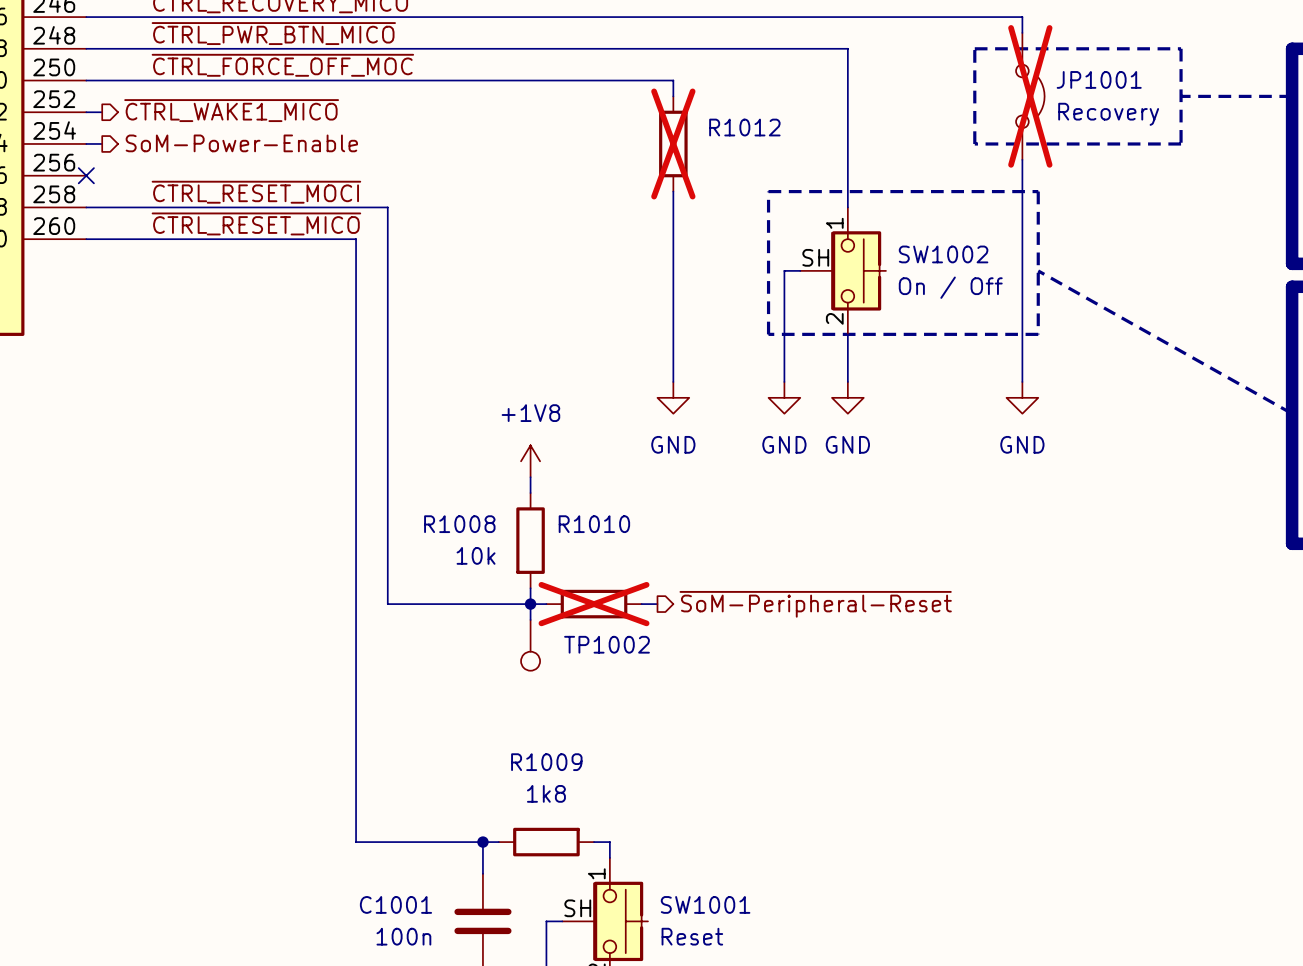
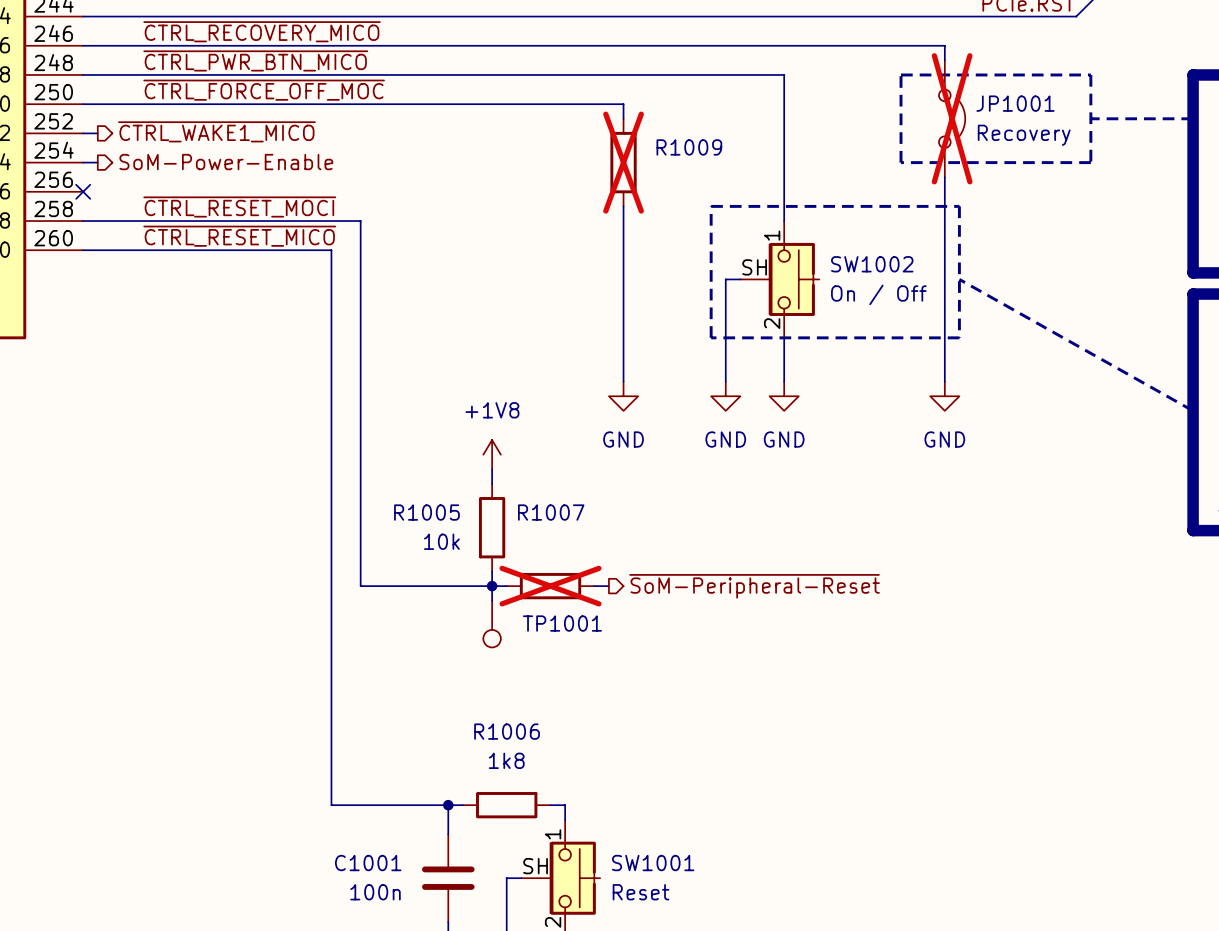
R1012 name: R1012 (744, 127) -> R1009 (689, 147)
R1008 name: R1008 (459, 524) -> R1005 (426, 512)
R1010 name: R1010 (594, 524) -> R1007 (551, 512)
TP1002 name: TP1002 (606, 644) -> TP1001 (562, 623)
R1009 name: R1009 (546, 762) -> R1006 (507, 731)

